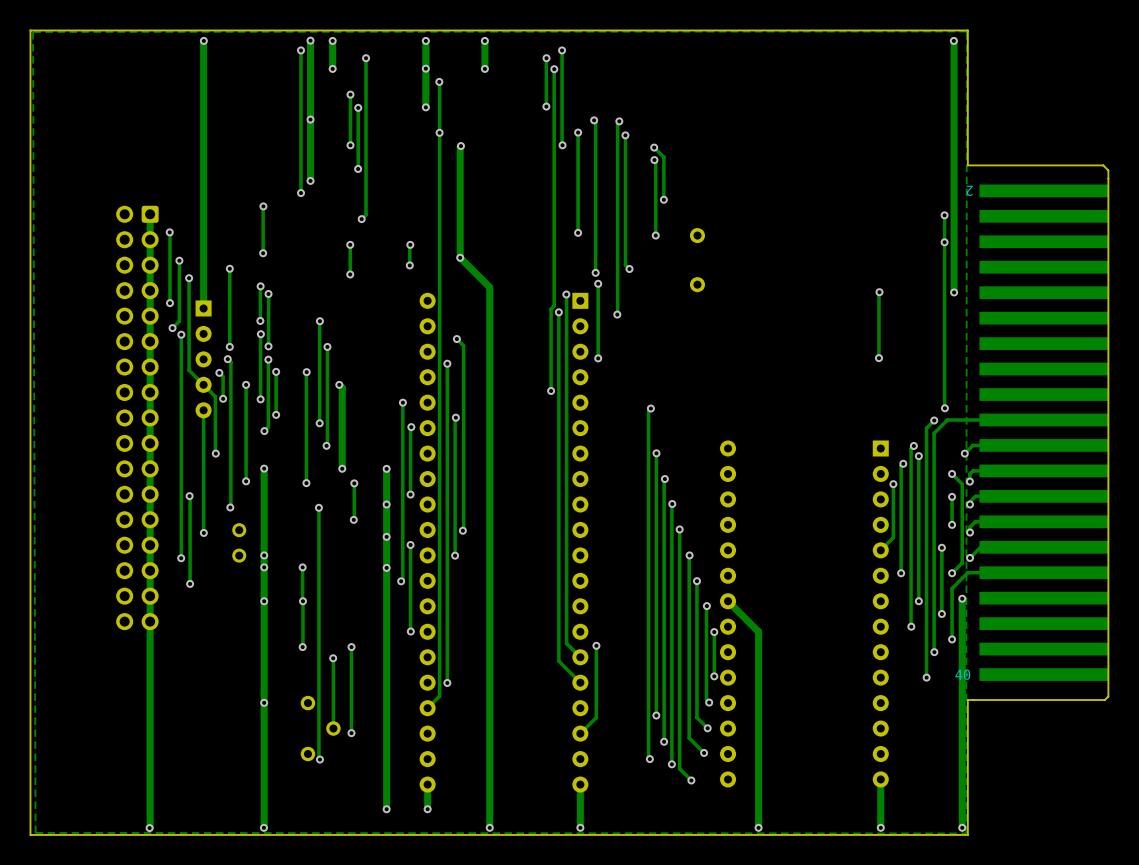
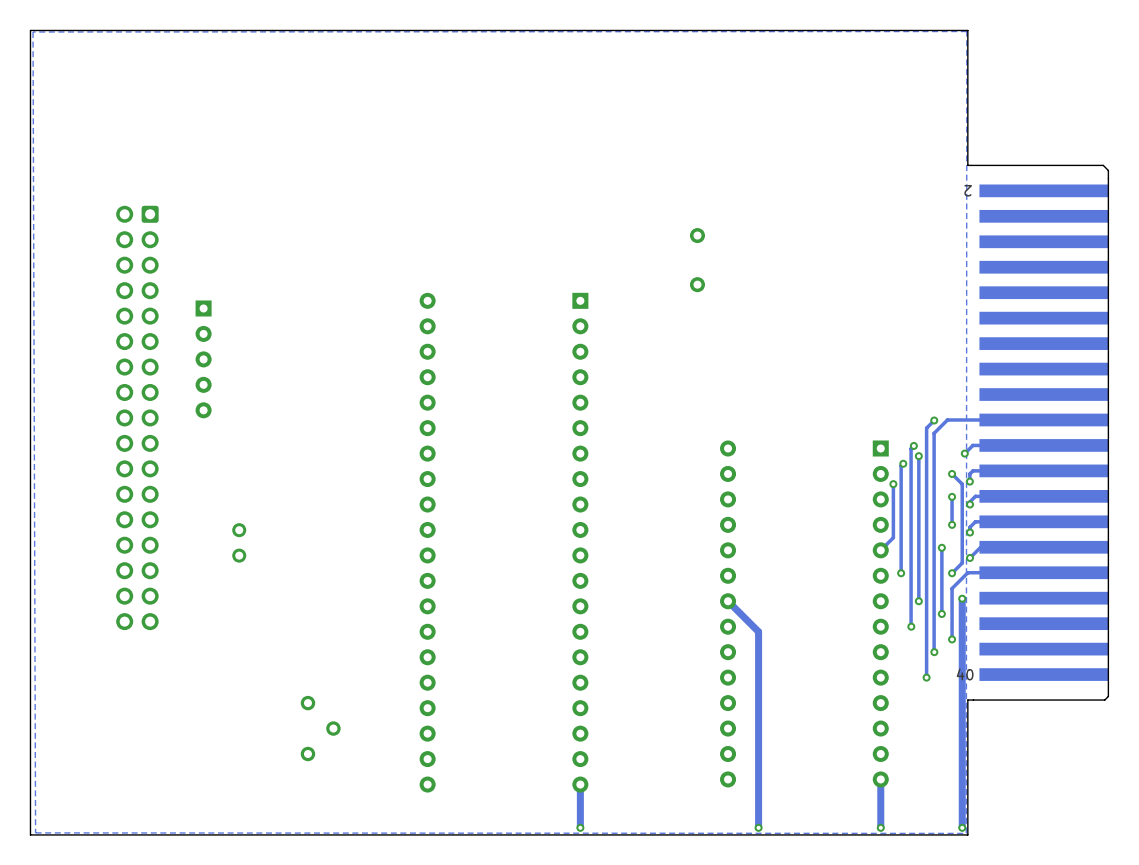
track: (203, 40) (203, 308) -> none
via: (203, 40) -> none
track: (310, 40) (310, 180) -> none
via: (310, 40) -> none
track: (332, 40) (332, 68) -> none
via: (332, 40) -> none
track: (425, 40) (425, 107) -> none
via: (425, 40) -> none
track: (484, 40) (484, 68) -> none
via: (484, 40) -> none
track: (953, 40) (954, 292) -> none
via: (953, 40) -> none
track: (301, 50) (301, 193) -> none
via: (301, 50) -> none
track: (562, 50) (562, 145) -> none
via: (562, 50) -> none
track: (366, 58) (366, 214) (361, 219) -> none
via: (366, 58) -> none
track: (546, 58) (546, 106) -> none
via: (546, 58) -> none
via: (332, 68) -> none
via: (425, 68) -> none
via: (484, 68) -> none
track: (554, 69) (554, 306) (551, 309) (551, 390) -> none
via: (554, 69) -> none
track: (439, 81) (439, 696) (427, 708) -> none
via: (439, 81) -> none
track: (350, 94) (350, 145) -> none
via: (350, 94) -> none
via: (546, 106) -> none
track: (358, 107) (358, 168) -> none
via: (358, 107) -> none
via: (425, 107) -> none
via: (310, 119) -> none
track: (594, 120) (595, 121) (595, 272) -> none
via: (594, 120) -> none
track: (619, 121) (617, 123) (617, 314) -> none
via: (619, 121) -> none
via: (439, 132) -> none
track: (578, 132) (578, 232) -> none
via: (578, 132) -> none
track: (625, 135) (625, 264) (629, 269) -> none
via: (625, 135) -> none
via: (350, 145) -> none
via: (562, 145) -> none
track: (460, 146) (460, 257) (489, 287) (489, 827) -> none
via: (460, 146) -> none
track: (654, 147) (663, 157) (663, 199) -> none
via: (654, 147) -> none
track: (654, 160) (655, 235) -> none
via: (654, 160) -> none
via: (358, 168) -> none
via: (310, 180) -> none
via: (301, 193) -> none
via: (663, 199) -> none
track: (263, 206) (263, 253) -> none
via: (263, 206) -> none
track: (150, 214) (149, 828) -> none
track: (944, 215) (944, 408) -> none
via: (944, 215) -> none
via: (361, 219) -> none
track: (169, 232) (169, 303) -> none
via: (169, 232) -> none
via: (578, 232) -> none
via: (655, 235) -> none
via: (944, 242) -> none
track: (350, 244) (350, 274) -> none
via: (350, 244) -> none
track: (410, 244) (409, 265) -> none
via: (410, 244) -> none
via: (263, 253) -> none
via: (460, 257) -> none
track: (179, 260) (179, 321) (172, 328) -> none
via: (179, 260) -> none
via: (409, 265) -> none
track: (229, 268) (229, 346) -> none
via: (229, 268) -> none
via: (629, 269) -> none
via: (595, 272) -> none
via: (350, 274) -> none
track: (189, 278) (189, 370) (215, 396) (215, 453) -> none
via: (189, 278) -> none
track: (598, 283) (598, 358) -> none
via: (598, 283) -> none
track: (260, 286) (260, 320) -> none
via: (260, 286) -> none
track: (879, 292) (879, 358) -> none
via: (879, 292) -> none
via: (954, 292) -> none
via: (268, 293) -> none
track: (268, 294) (268, 346) -> none
track: (566, 294) (566, 643) (580, 657) -> none
via: (566, 294) -> none
via: (169, 303) -> none
track: (558, 312) (558, 661) (580, 682) -> none
via: (558, 312) -> none
via: (617, 314) -> none
via: (260, 320) -> none
track: (319, 321) (319, 423) -> none
via: (319, 321) -> none
via: (172, 328) -> none
track: (181, 334) (181, 558) -> none
via: (181, 334) -> none
track: (260, 334) (260, 399) -> none
via: (260, 334) -> none
track: (456, 339) (463, 345) (462, 530) -> none
via: (456, 339) -> none
via: (229, 346) -> none
via: (268, 346) -> none
track: (327, 346) (326, 445) -> none
via: (327, 346) -> none
via: (598, 358) -> none
via: (879, 358) -> none
track: (227, 359) (230, 362) (230, 507) -> none
via: (227, 359) -> none
track: (268, 359) (268, 427) (264, 431) -> none
via: (268, 359) -> none
track: (447, 363) (447, 682) -> none
via: (447, 363) -> none
track: (276, 371) (276, 414) -> none
via: (276, 371) -> none
track: (219, 372) (223, 376) (223, 398) -> none
via: (219, 372) -> none
track: (306, 372) (306, 483) -> none
via: (306, 372) -> none
track: (246, 384) (246, 481) -> none
via: (246, 384) -> none
track: (339, 384) (342, 387) (342, 468) -> none
via: (339, 384) -> none
via: (551, 390) -> none
via: (223, 398) -> none
via: (260, 399) -> none
track: (402, 402) (402, 579) (401, 581) -> none
via: (402, 402) -> none
track: (650, 408) (648, 410) (649, 759) -> none
via: (650, 408) -> none
via: (944, 408) -> none
track: (203, 410) (203, 532) -> none
via: (276, 414) -> none
track: (455, 417) (455, 555) -> none
via: (455, 417) -> none
via: (319, 423) -> none
track: (411, 427) (410, 494) -> none
via: (411, 427) -> none
via: (264, 431) -> none
via: (326, 445) -> none
via: (215, 453) -> none
track: (656, 453) (656, 715) -> none
via: (656, 453) -> none
track: (264, 468) (263, 827) -> none
via: (264, 468) -> none
via: (342, 468) -> none
track: (386, 468) (386, 809) -> none
via: (386, 468) -> none
track: (664, 479) (664, 741) -> none
via: (664, 479) -> none
via: (246, 481) -> none
via: (306, 483) -> none
track: (354, 483) (353, 519) -> none
via: (354, 483) -> none
via: (410, 494) -> none
track: (189, 496) (190, 583) -> none
via: (189, 496) -> none
via: (386, 504) -> none
track: (672, 504) (671, 764) -> none
via: (672, 504) -> none
via: (230, 507) -> none
track: (318, 507) (319, 759) -> none
via: (318, 507) -> none
via: (353, 519) -> none
track: (679, 529) (679, 768) (691, 780) -> none
via: (679, 529) -> none
via: (462, 530) -> none
via: (203, 532) -> none
via: (386, 536) -> none
track: (410, 544) (410, 631) -> none
via: (410, 544) -> none
via: (264, 555) -> none
via: (455, 555) -> none
track: (689, 555) (689, 738) (704, 752) -> none
via: (689, 555) -> none
via: (181, 558) -> none
via: (264, 567) -> none
track: (302, 567) (302, 647) -> none
via: (302, 567) -> none
via: (386, 567) -> none
via: (401, 581) -> none
track: (696, 581) (696, 717) (707, 728) -> none
via: (696, 581) -> none
via: (190, 583) -> none
via: (264, 601) -> none
via: (302, 601) -> none
track: (706, 606) (706, 699) (709, 702) -> none
via: (706, 606) -> none
via: (410, 631) -> none
track: (714, 632) (714, 676) -> none
via: (714, 632) -> none
track: (596, 645) (596, 717) (580, 733) -> none
via: (596, 645) -> none
via: (302, 647) -> none
track: (351, 647) (351, 733) -> none
via: (351, 647) -> none
track: (333, 658) (333, 728) -> none
via: (333, 658) -> none
via: (714, 676) -> none
via: (447, 682) -> none
via: (264, 702) -> none
via: (709, 702) -> none
via: (656, 715) -> none
via: (707, 728) -> none
via: (351, 733) -> none
via: (664, 741) -> none
via: (704, 752) -> none
via: (319, 759) -> none
via: (649, 759) -> none
via: (671, 764) -> none
via: (691, 780) -> none
track: (427, 784) (427, 809) -> none
via: (386, 809) -> none
via: (427, 809) -> none
via: (263, 827) -> none
via: (489, 827) -> none
via: (149, 828) -> none

